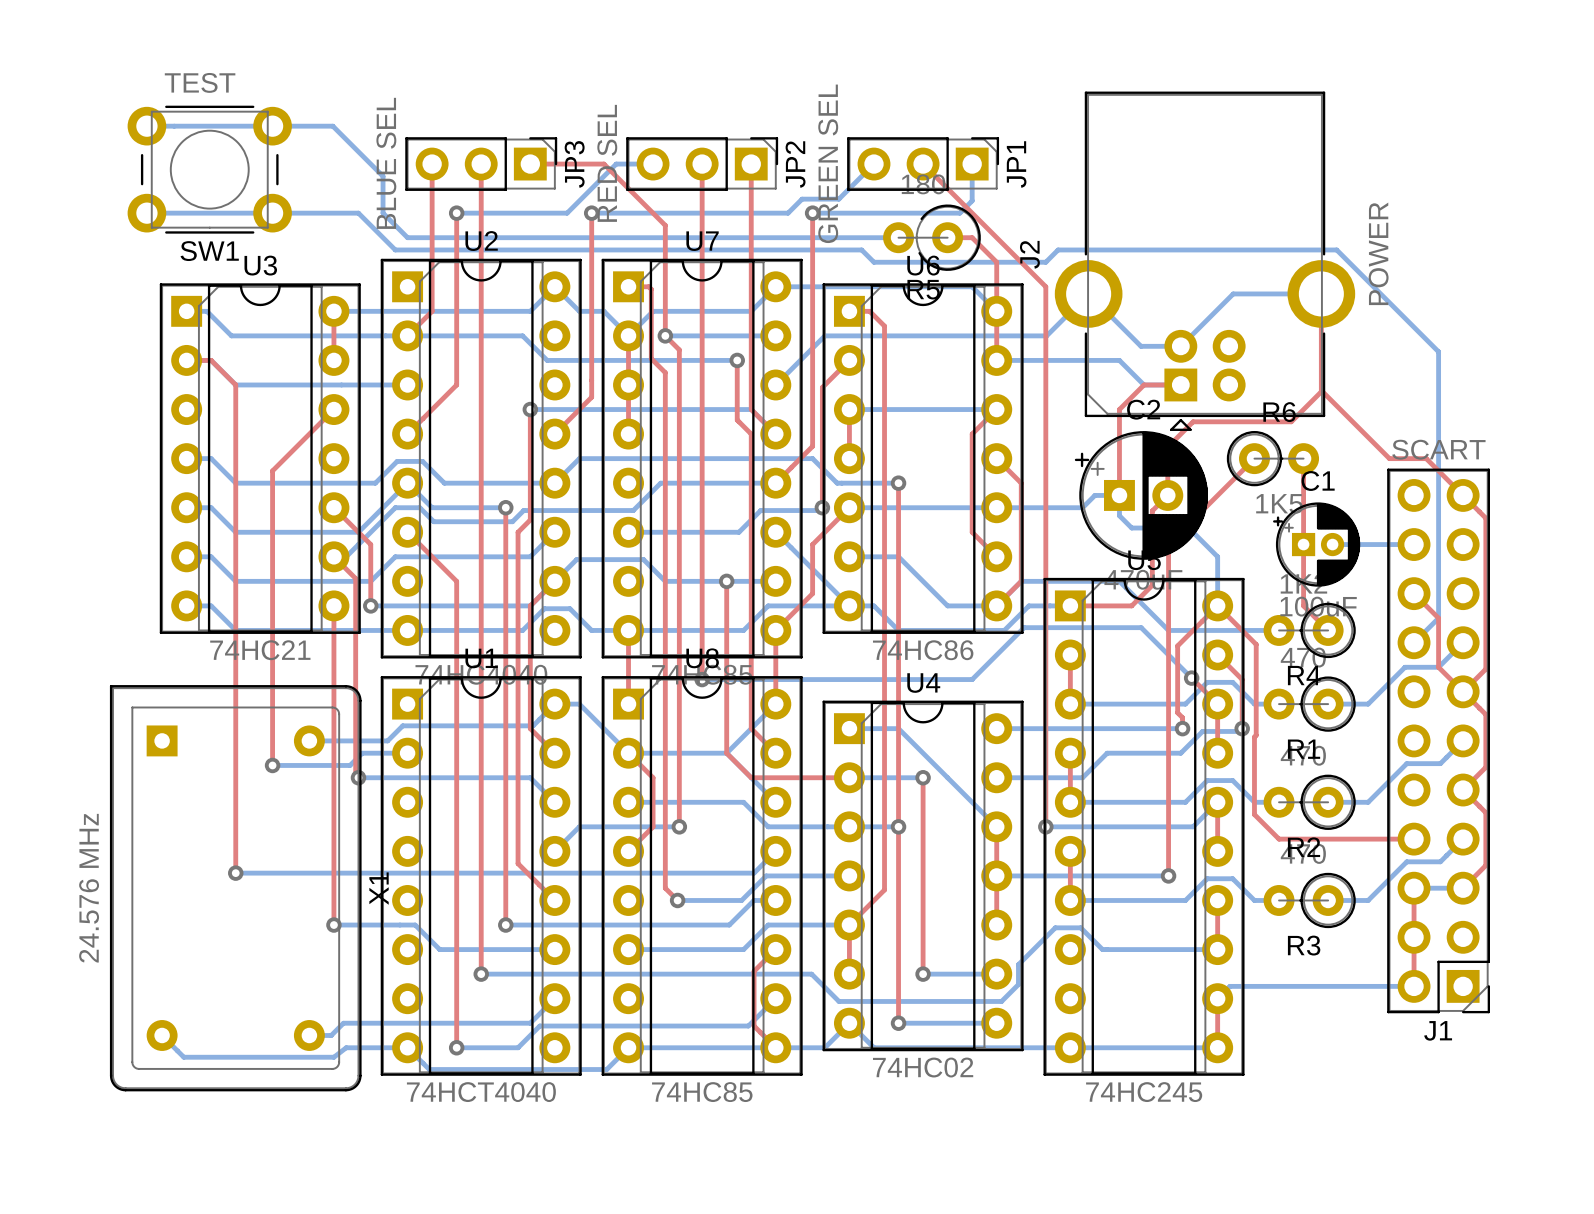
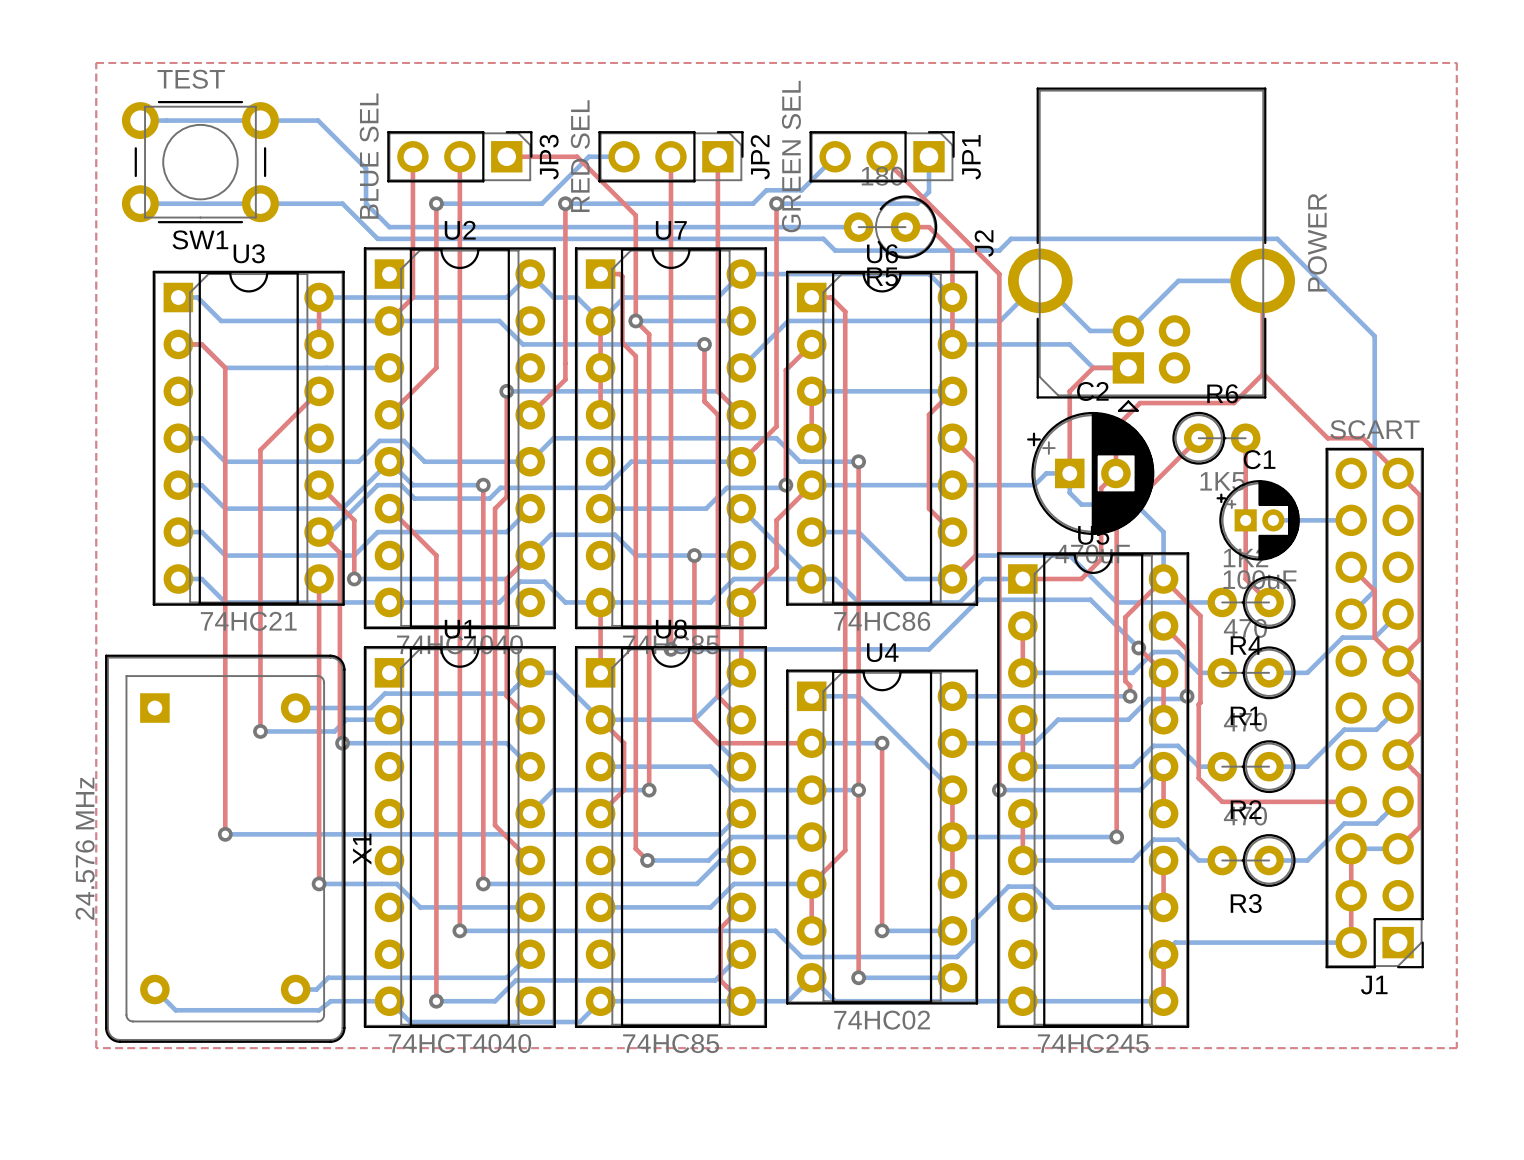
top zone outline: none -> (96, 62) (96, 1048) (1456, 1048) (1456, 62) (96, 62)

